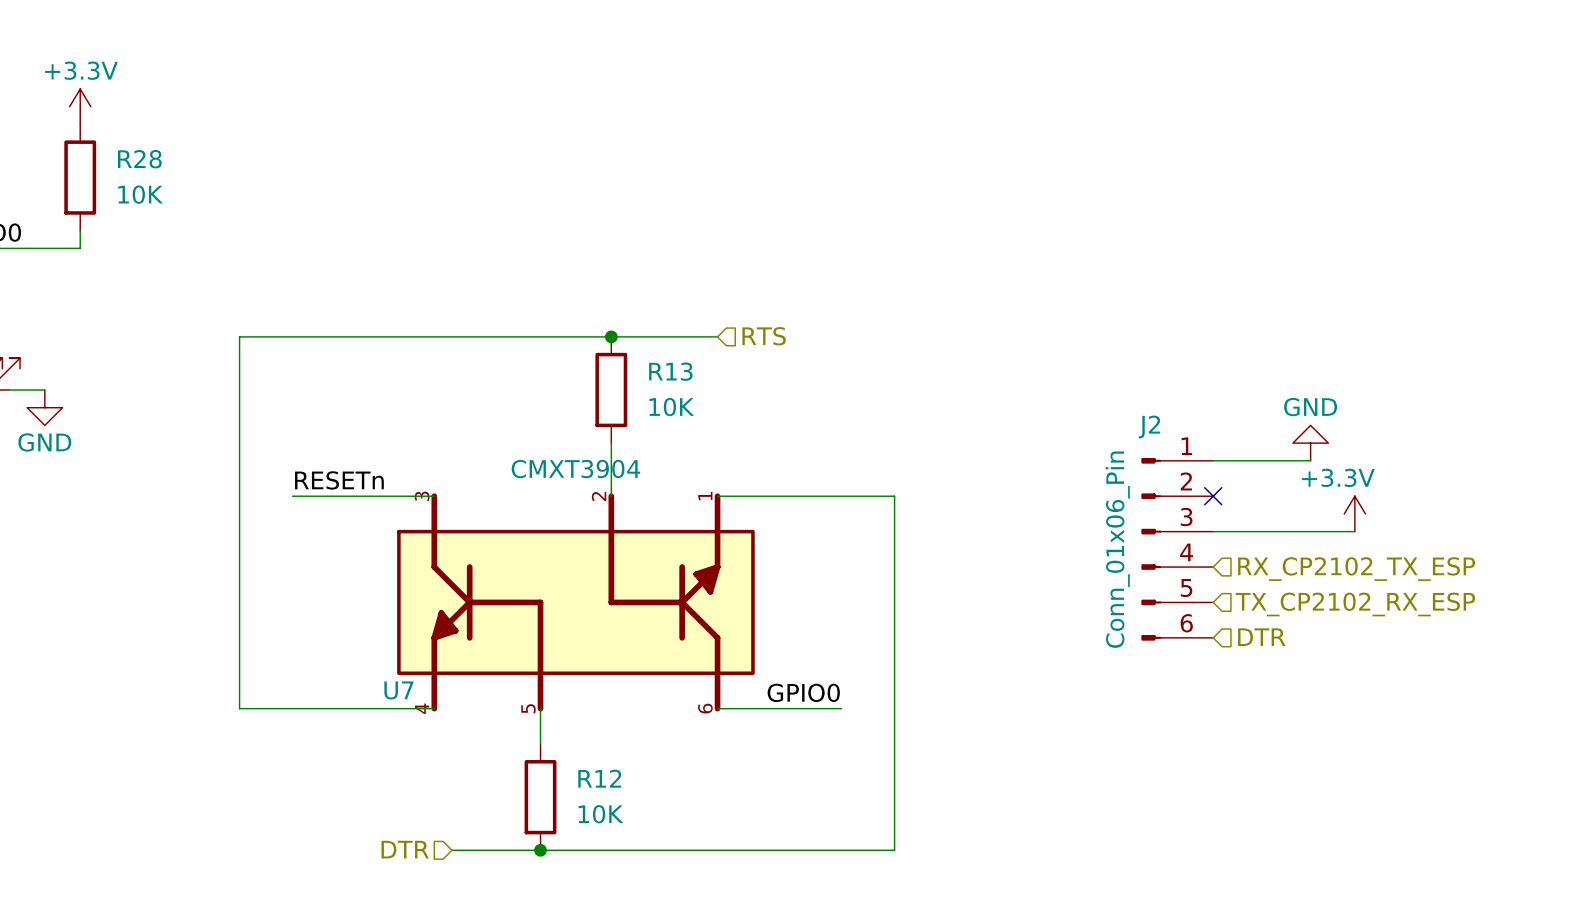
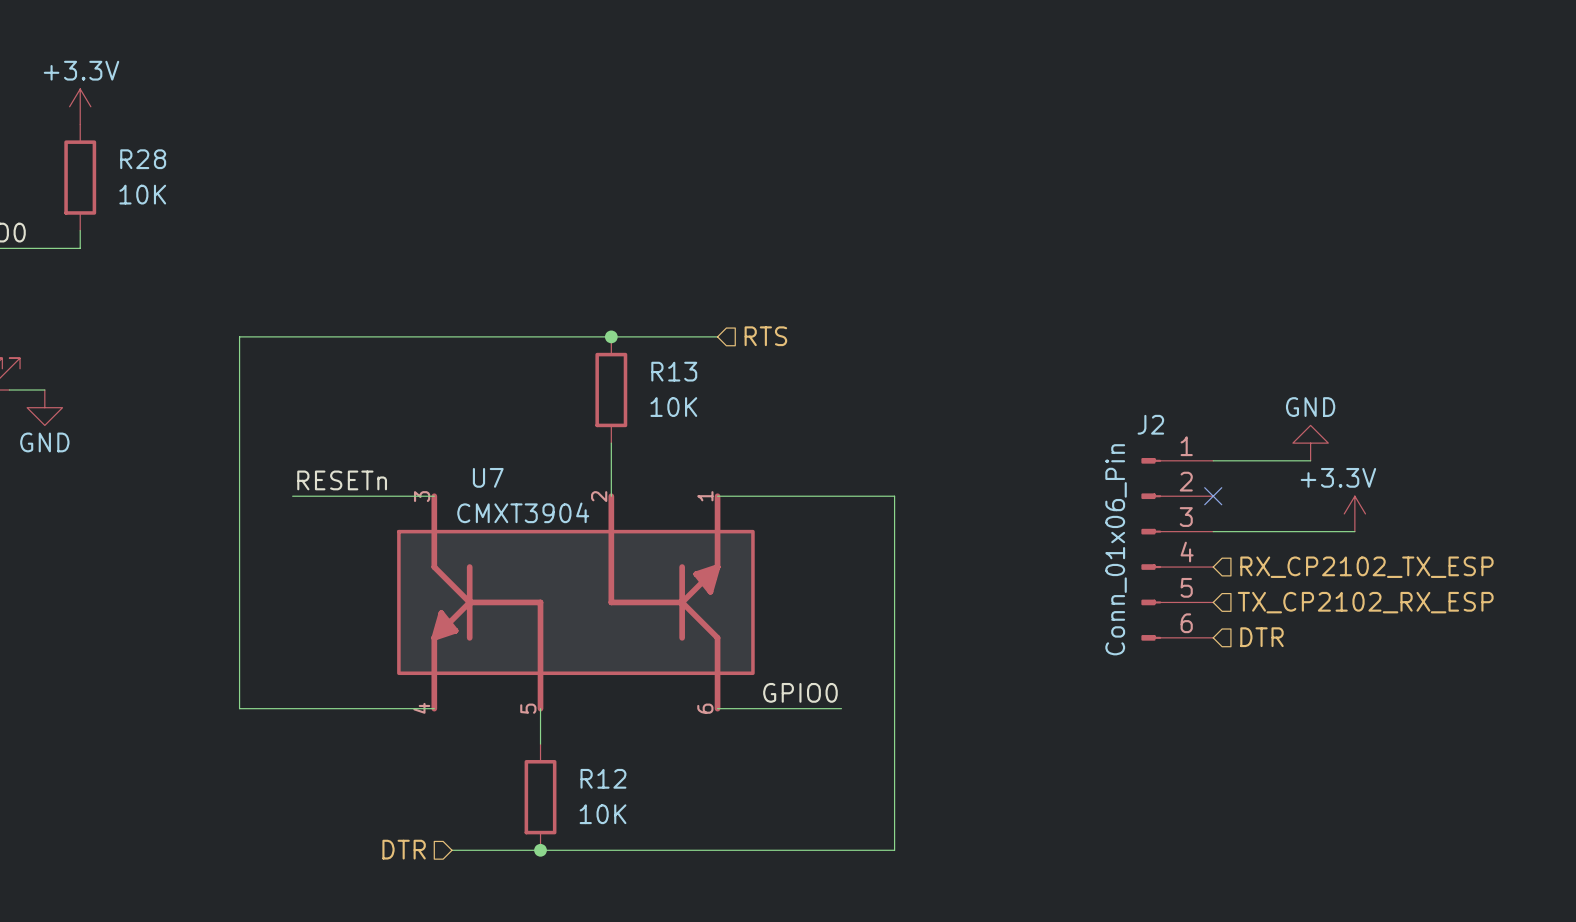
U7 value position: CMXT3904 (575, 469) -> CMXT3904 (523, 512)
U7 name position: U7 (398, 690) -> U7 (488, 477)

